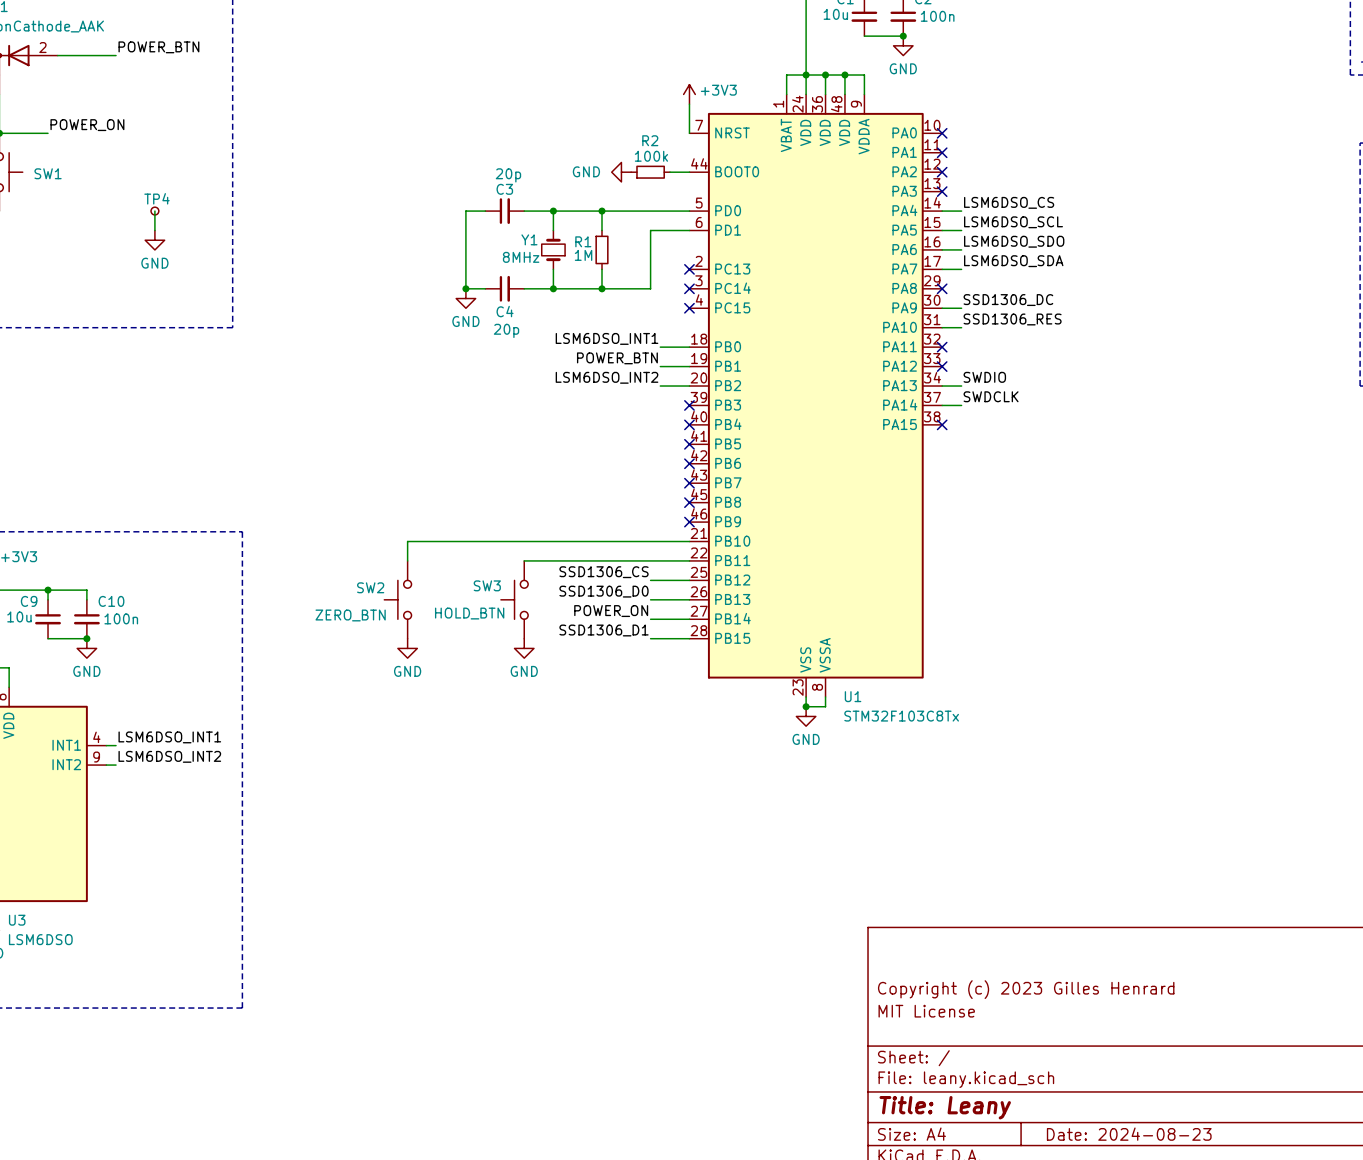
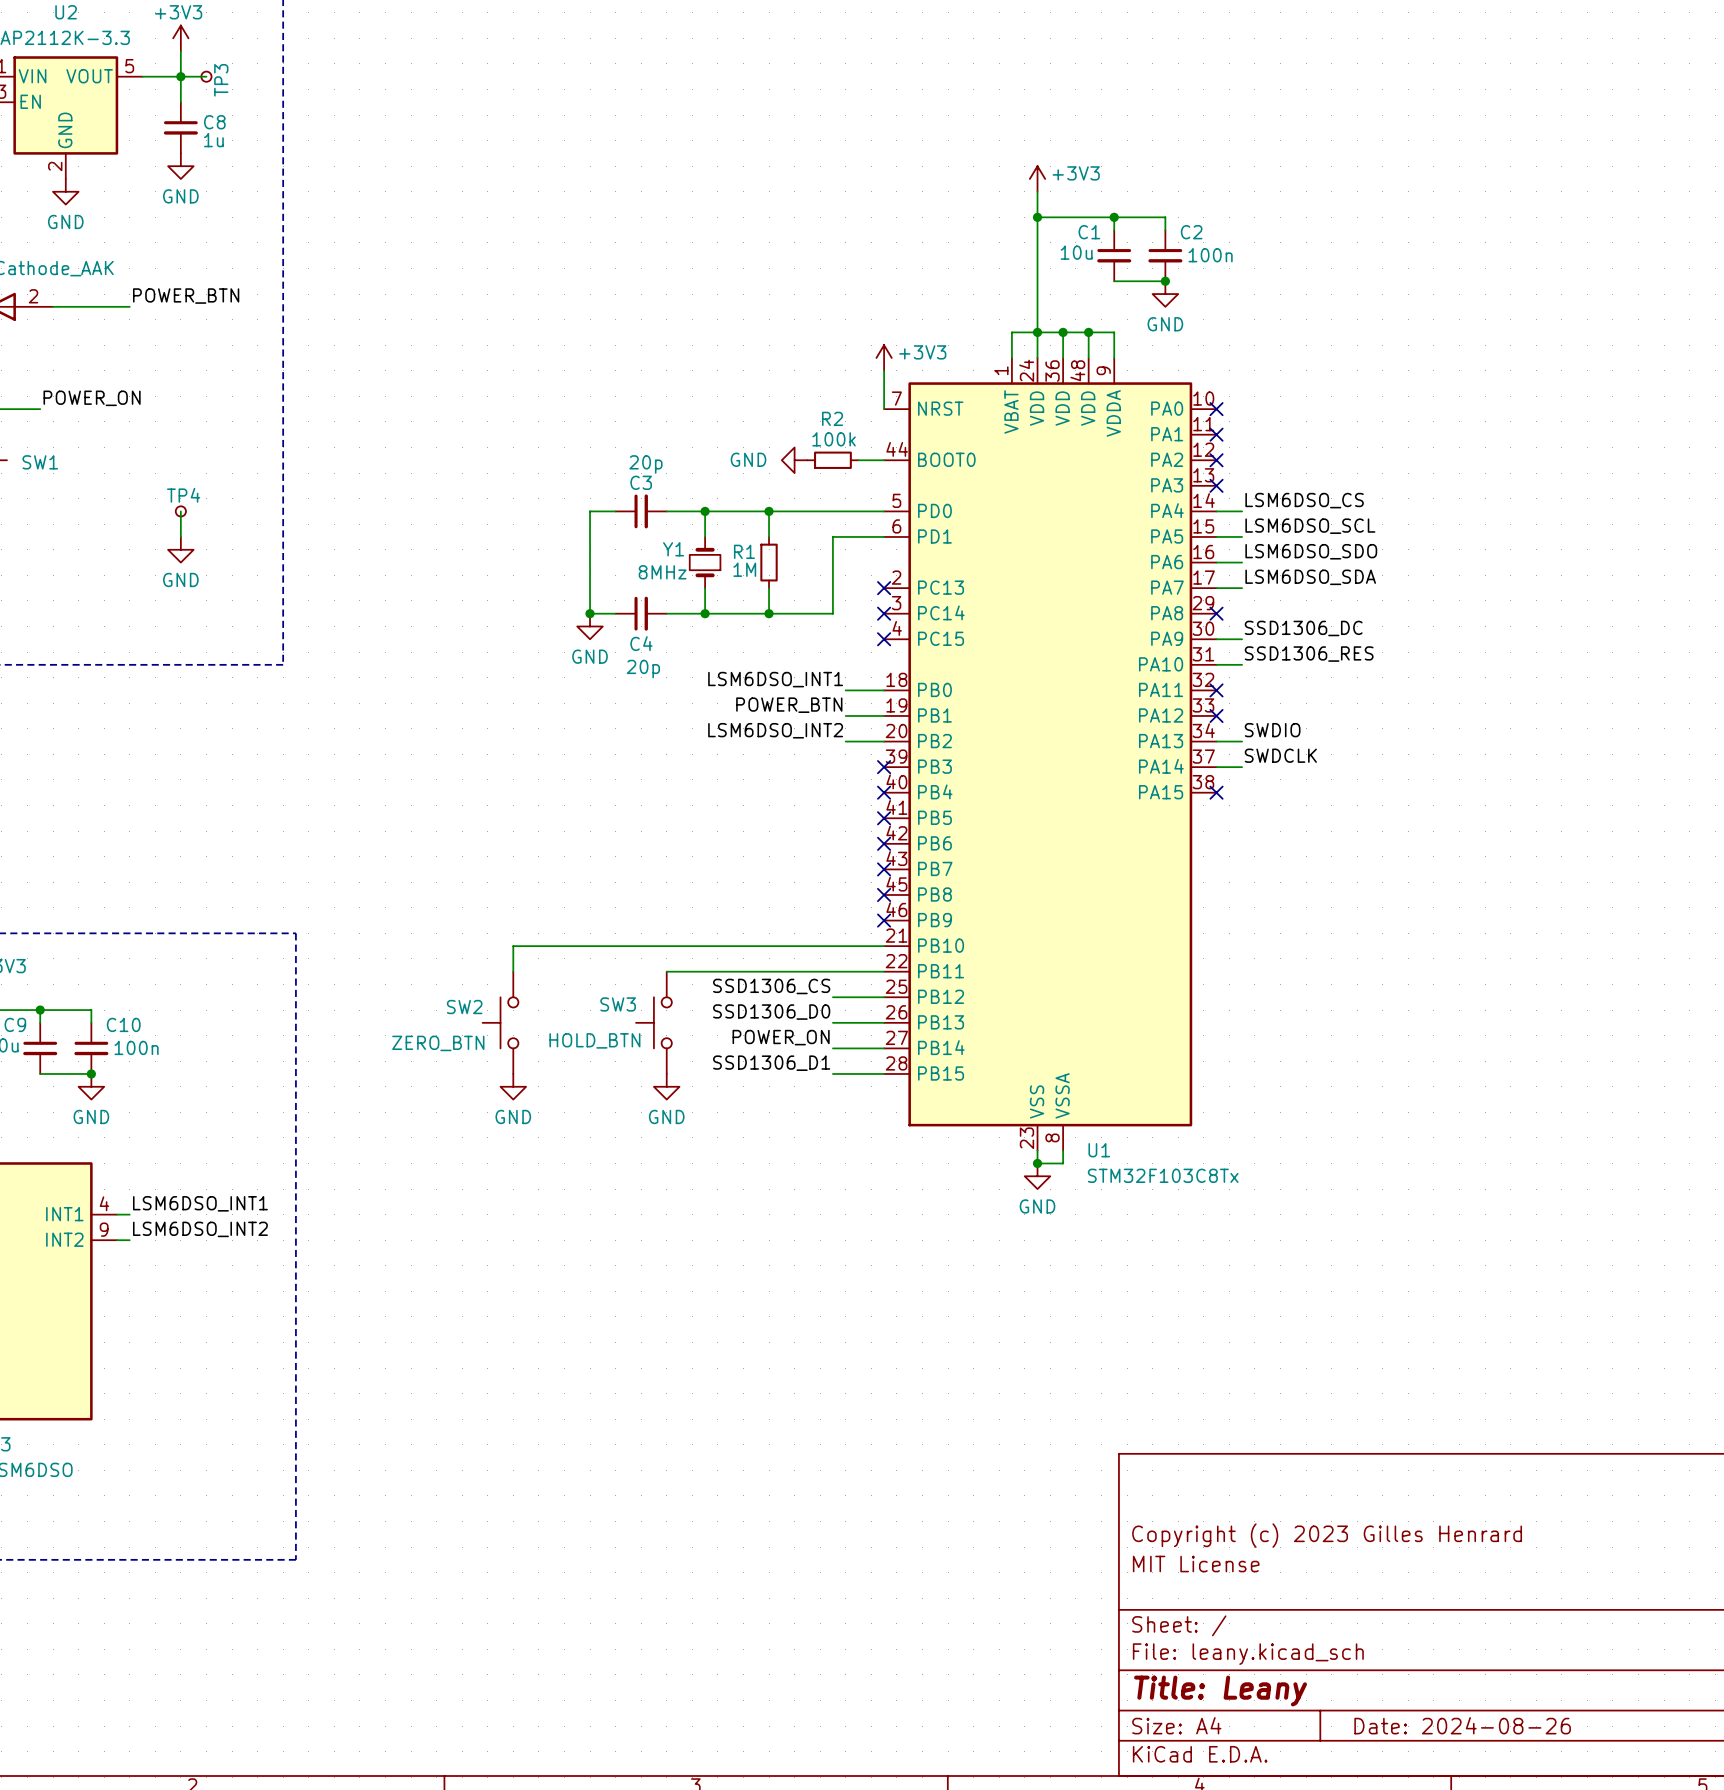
title block: Date: 2024-08-23 (1129, 1134) -> Date: 2024-08-26 (1462, 1725)

